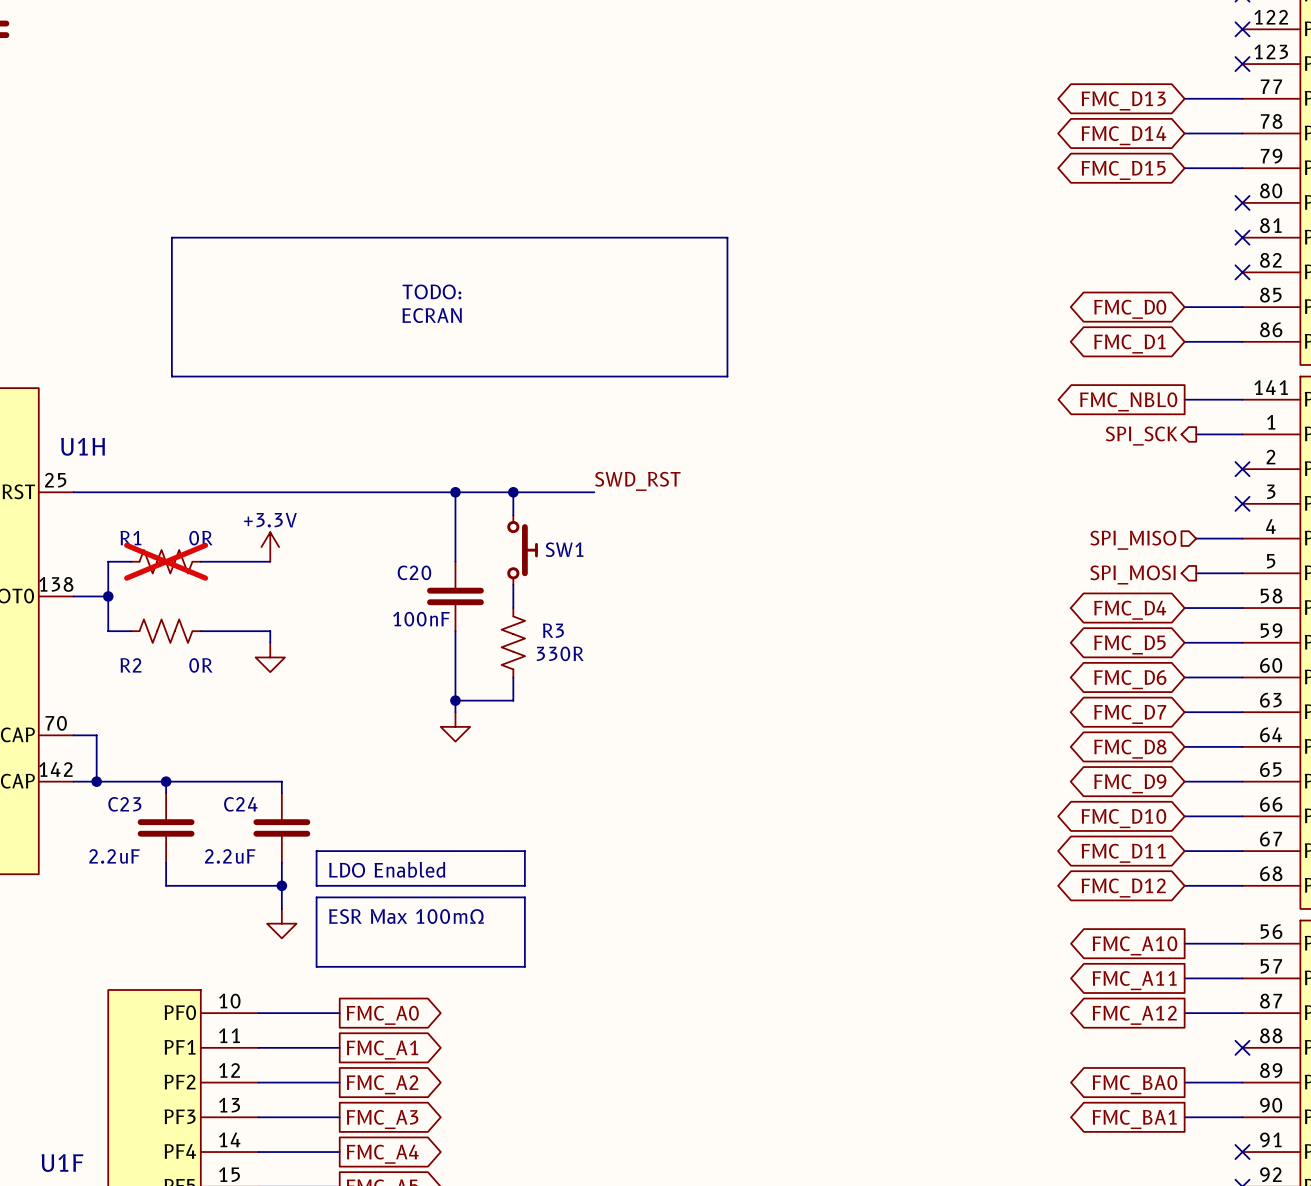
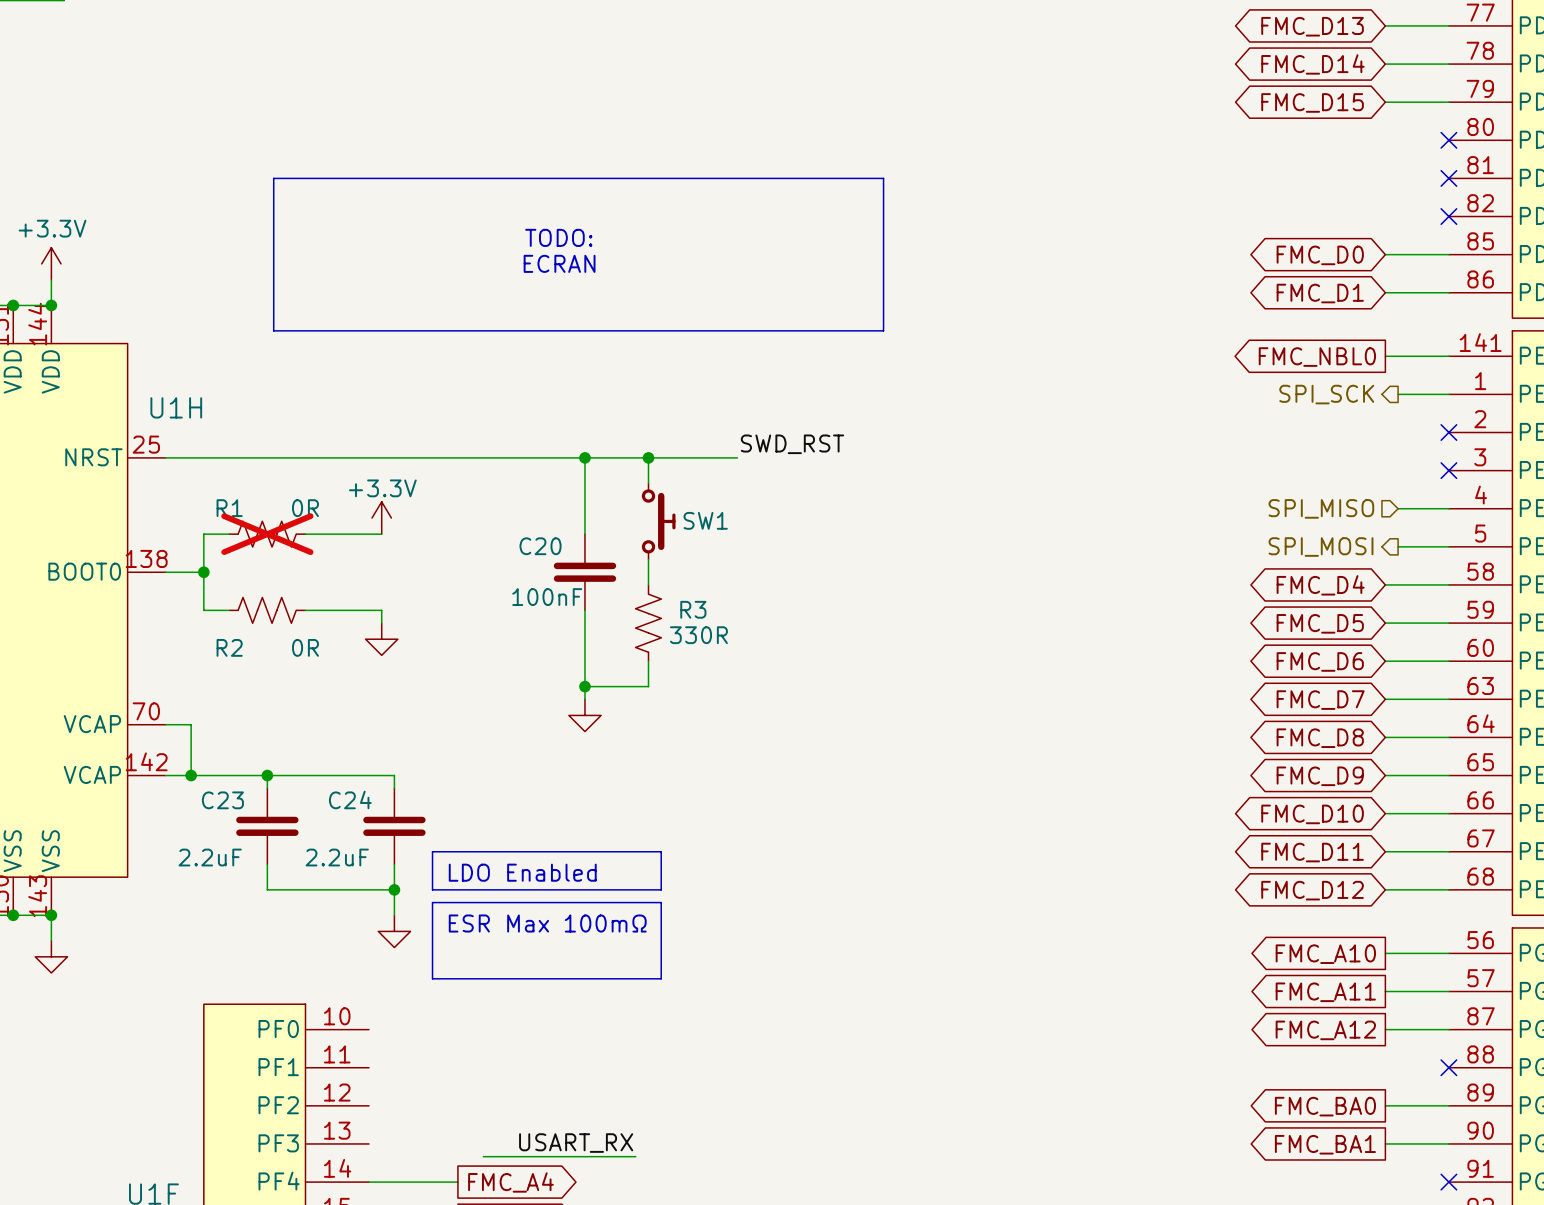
wire: (258, 1013) (339, 1013) -> none
global label: FMC_A0 (382, 1015) -> none
wire: (258, 1047) (339, 1047) -> none
global label: FMC_A1 (382, 1050) -> none
wire: (258, 1082) (339, 1082) -> none
global label: FMC_A2 (382, 1084) -> none
wire: (258, 1117) (339, 1117) -> none
label: none -> USART_RX (576, 1143)
global label: FMC_A3 (382, 1119) -> none
wire: none -> (483, 1156) (635, 1156)

